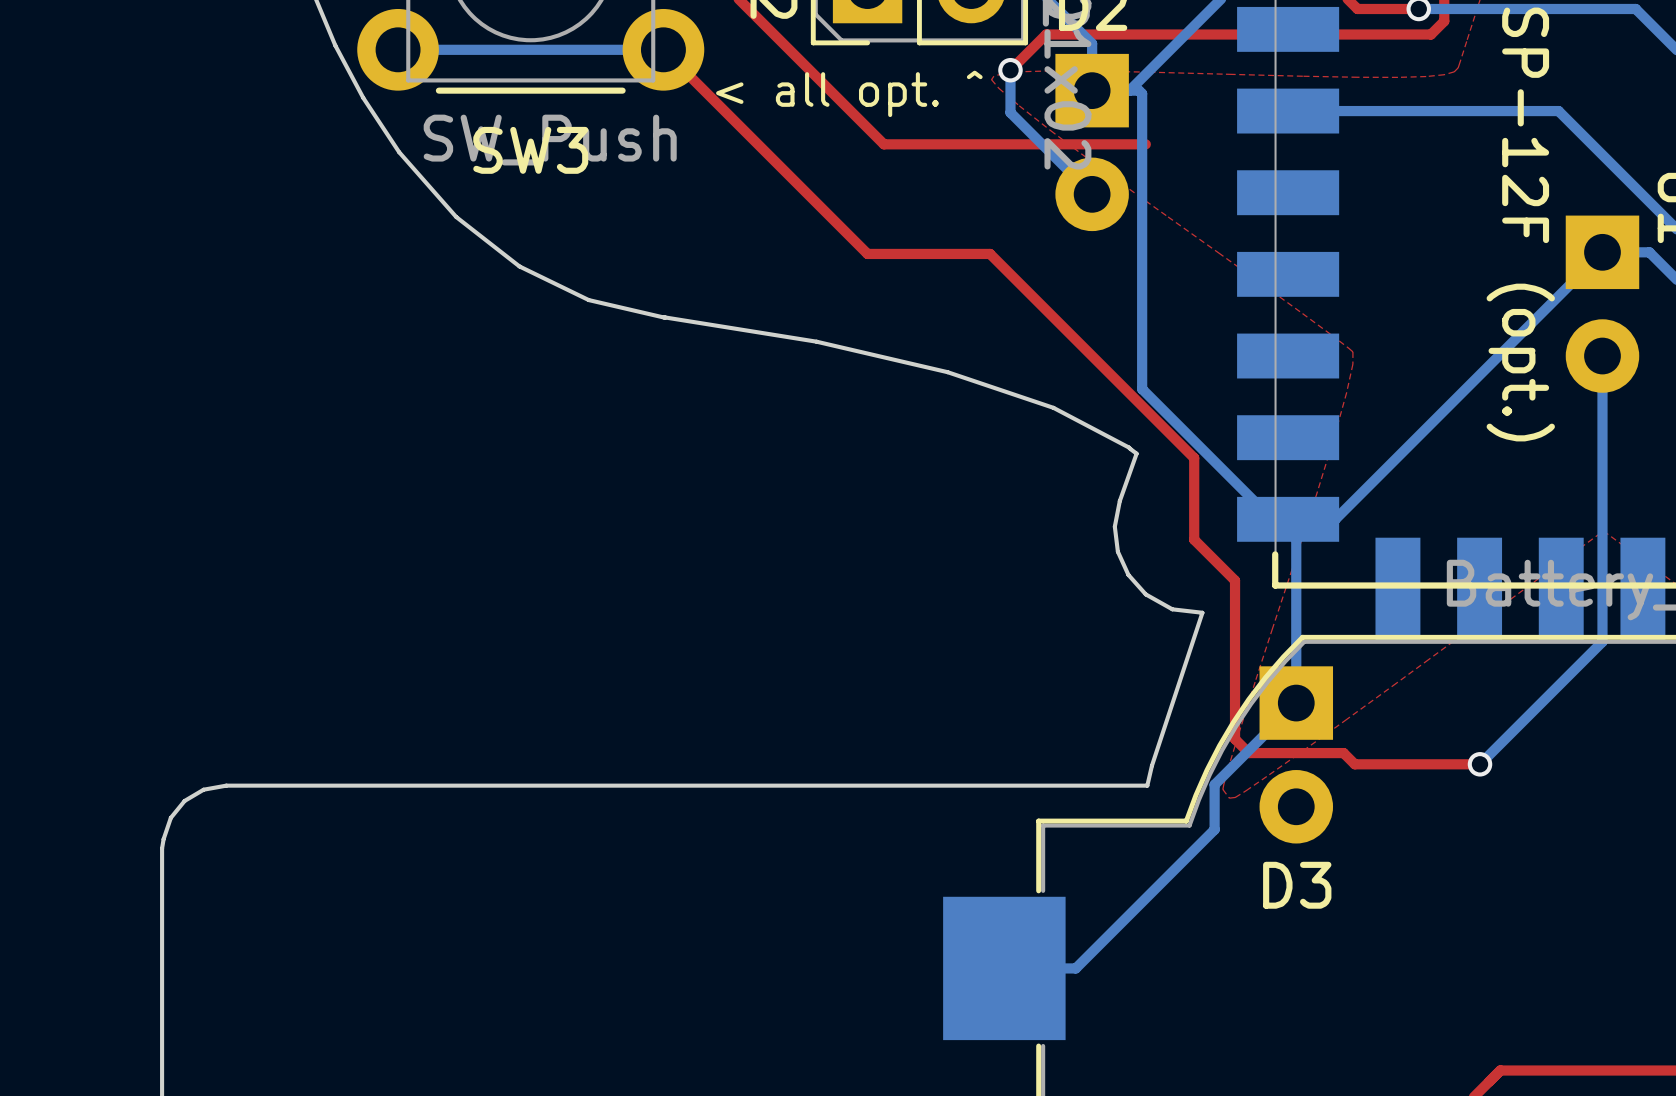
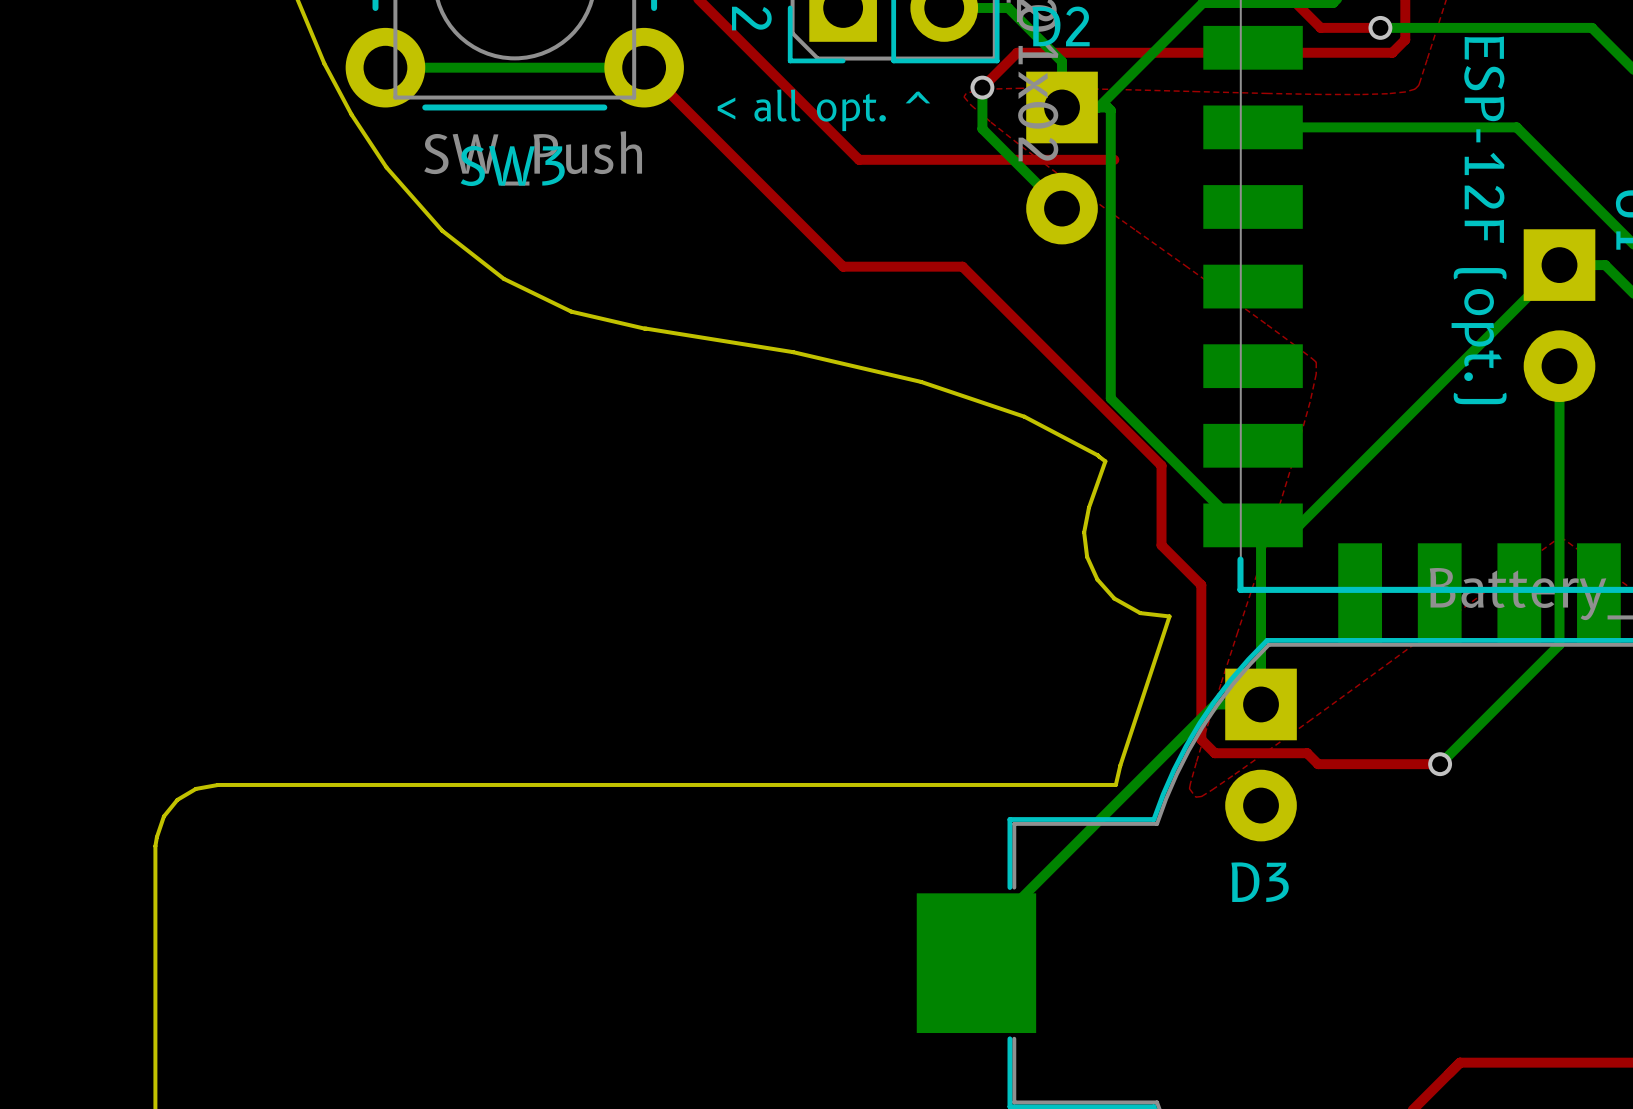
bottom track: (1296, 703) (1214, 784) (1214, 829) (1075, 968) (1004, 968) -> (1261, 704) (1215, 704) (995, 924)

